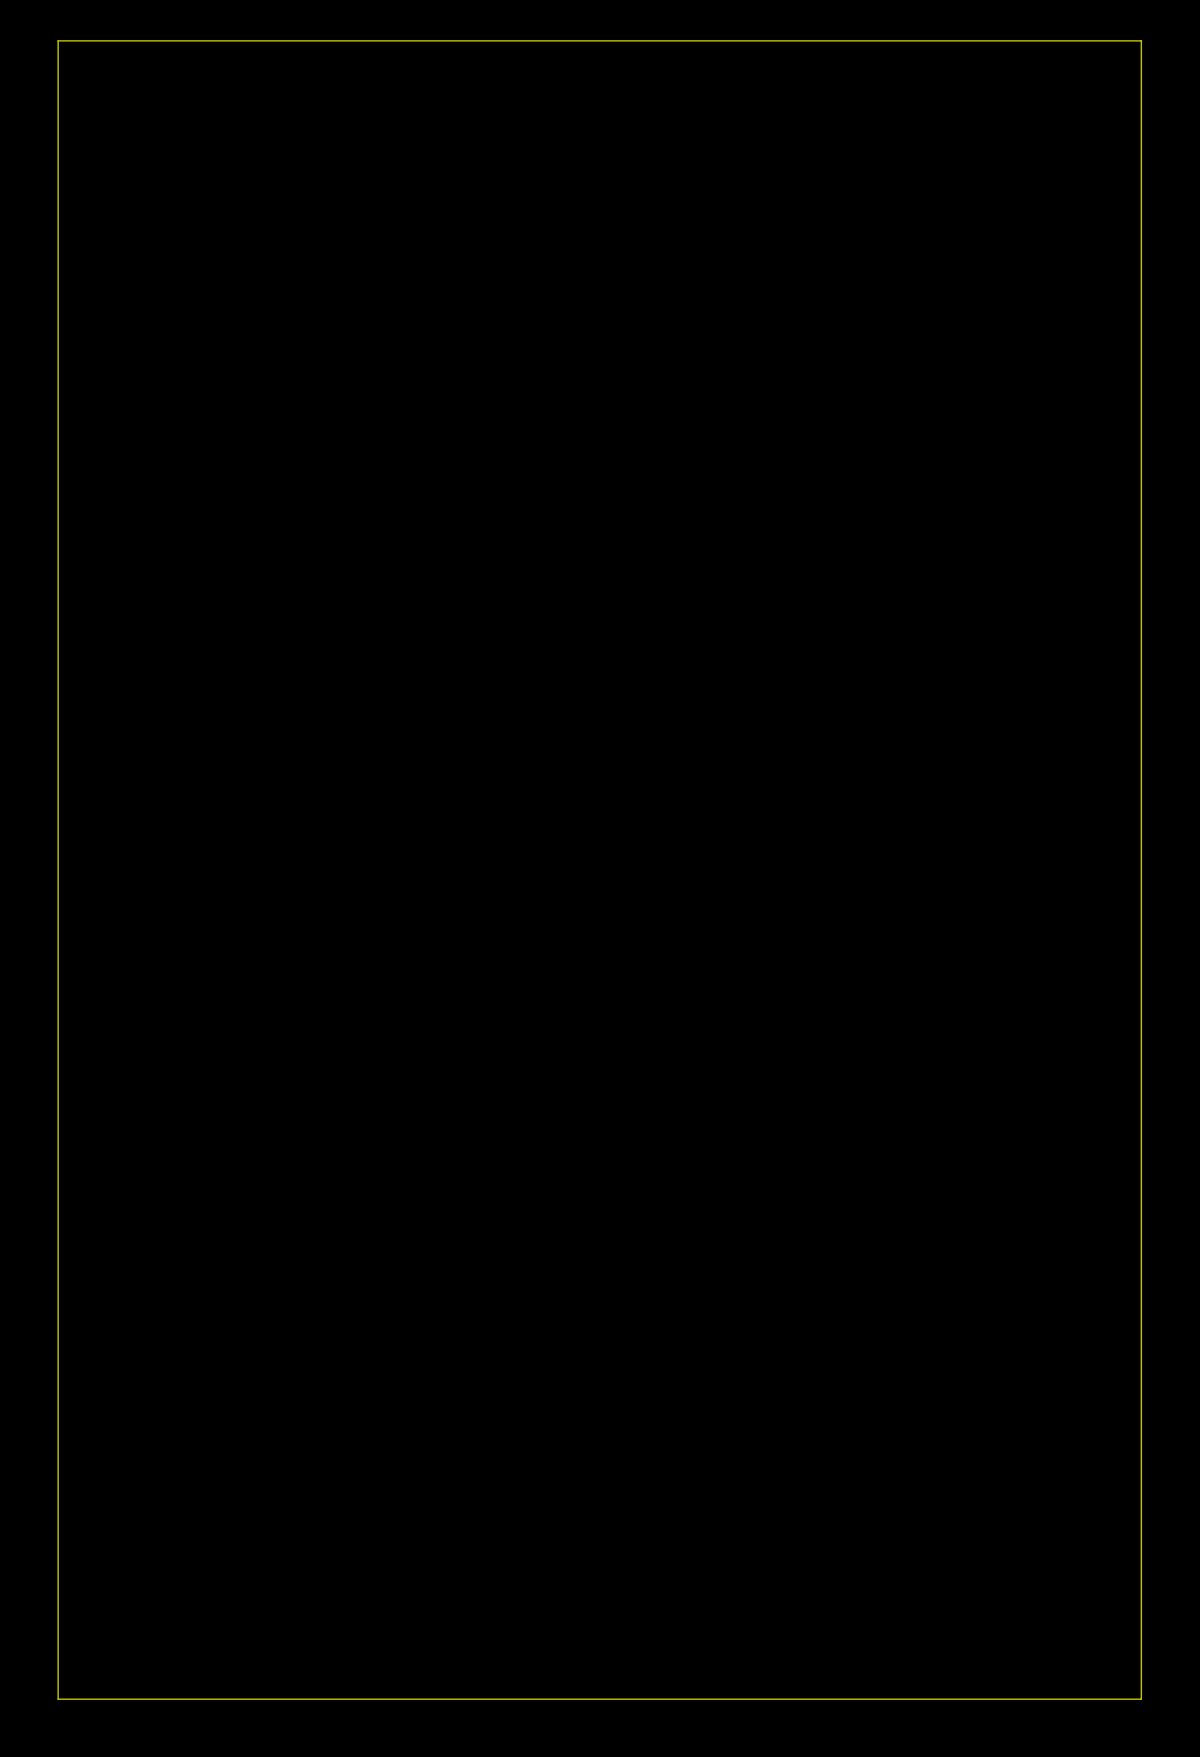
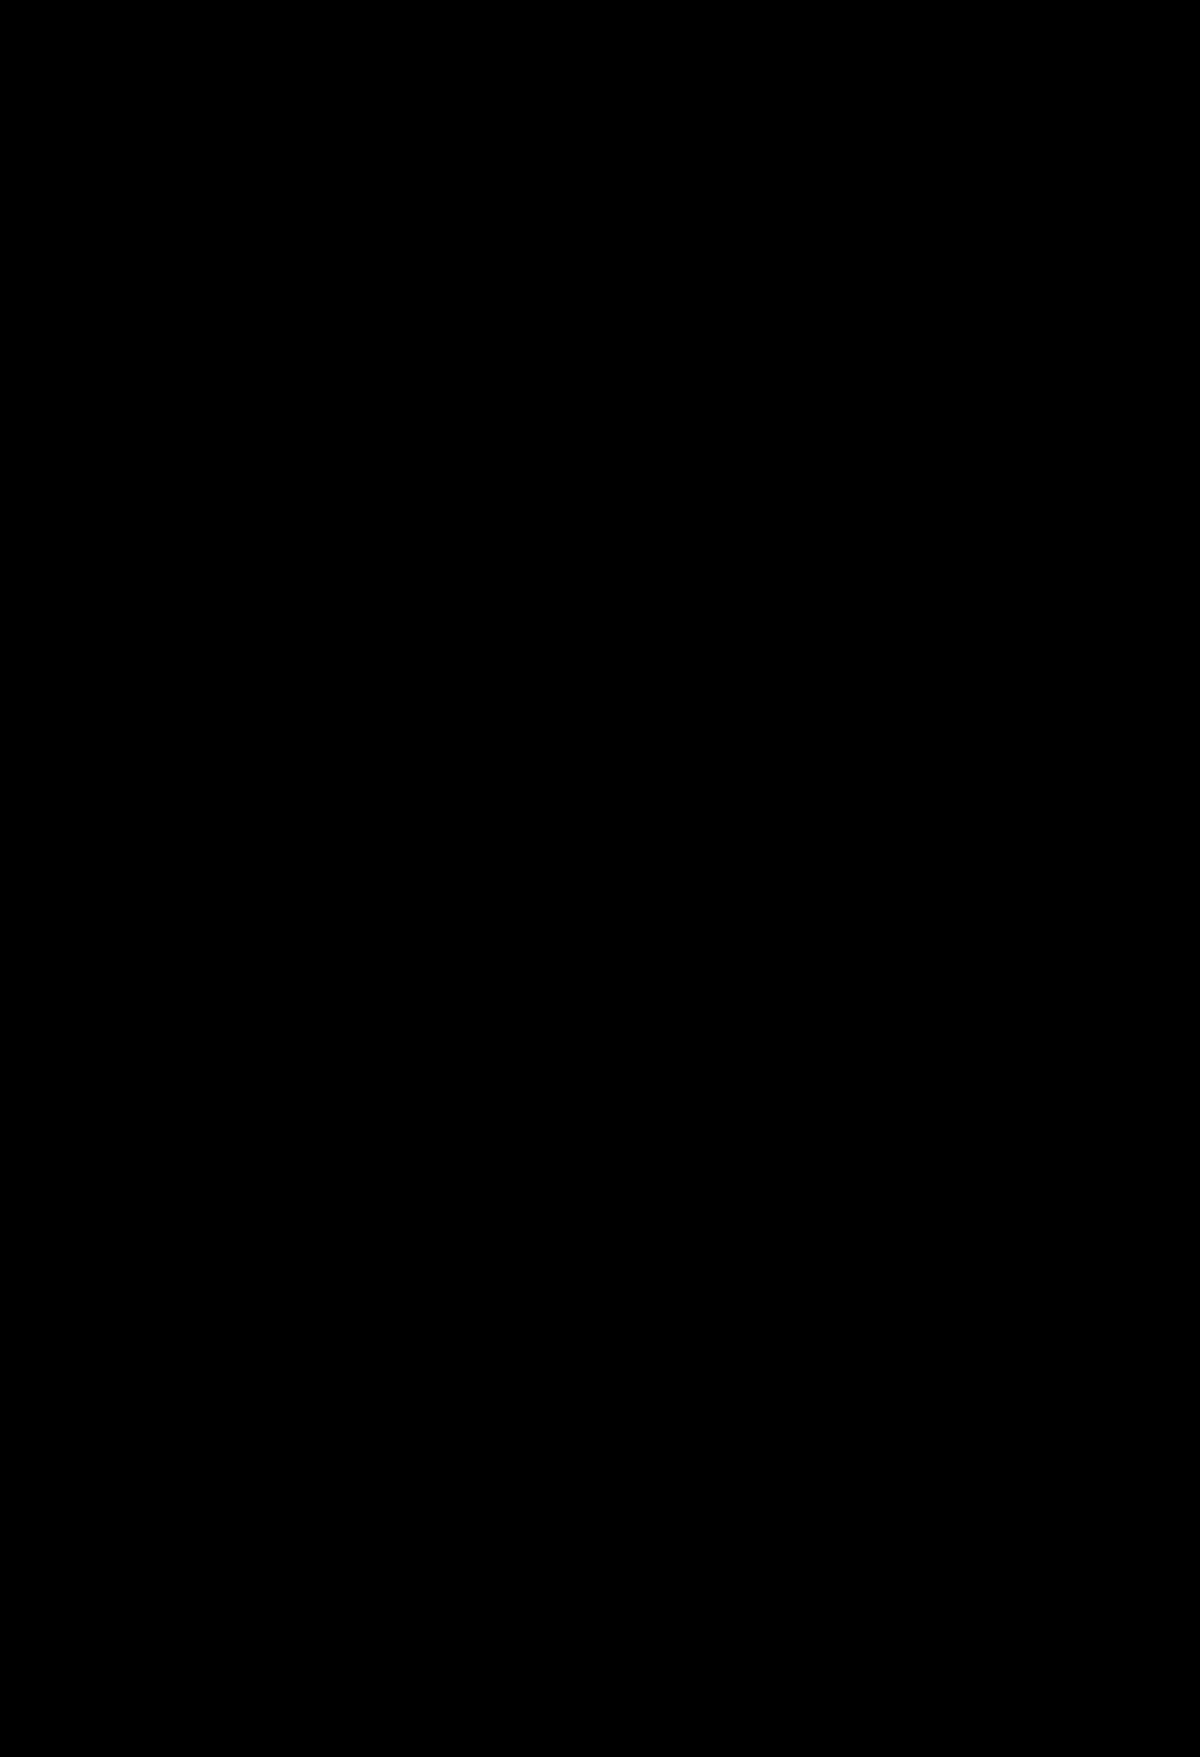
board edge: (1141, 40) (58, 40) (58, 1699) (1141, 1699) (1141, 40) -> none

